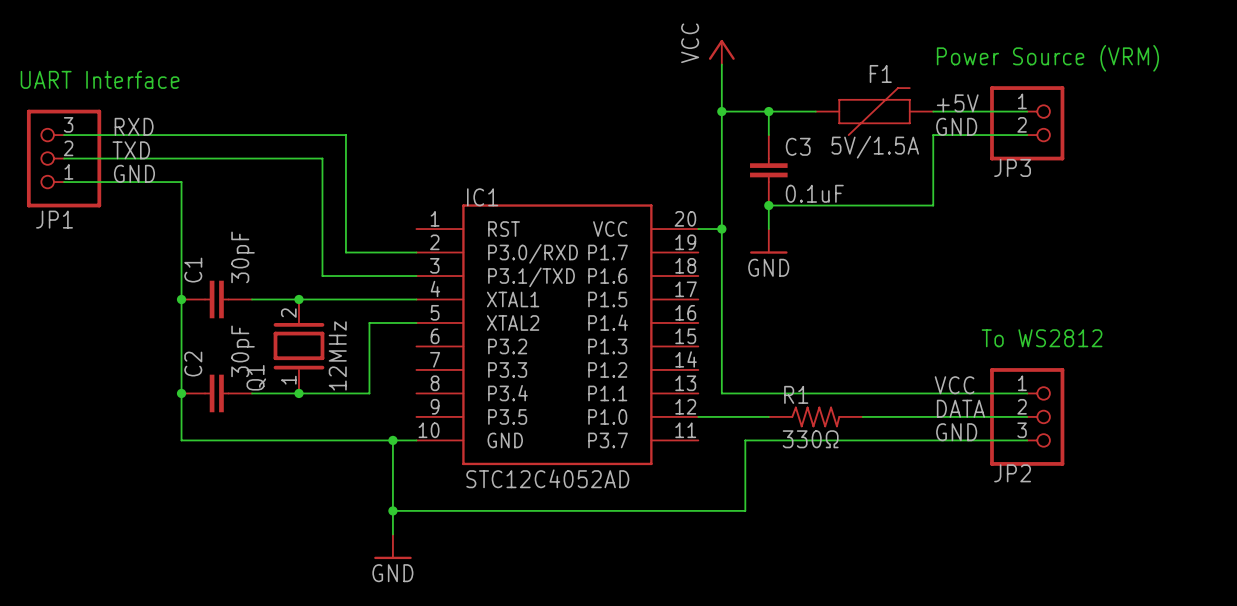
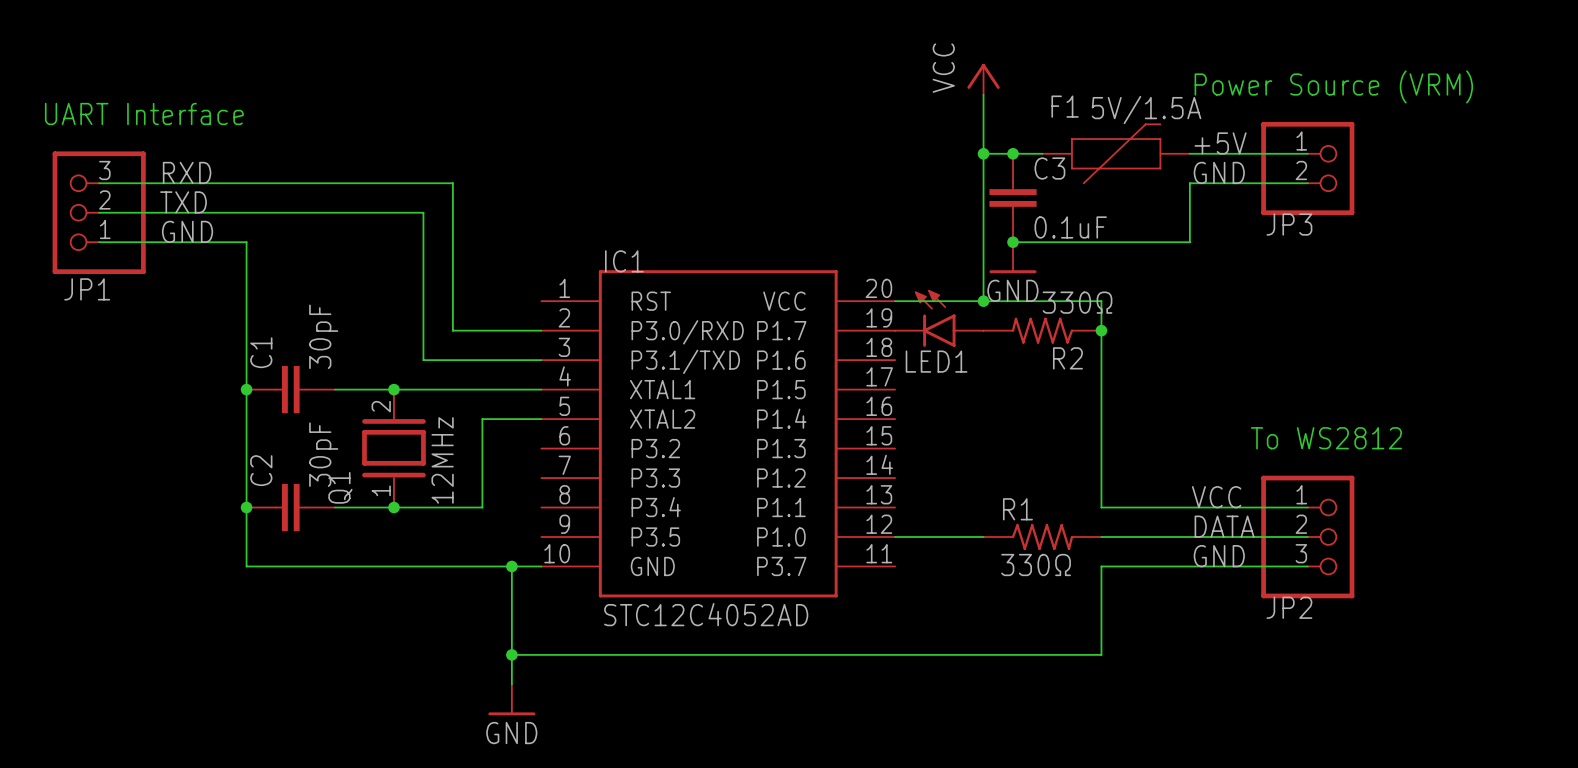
power symbol position: VCC (721, 52) -> VCC (983, 79)
wire: (721, 64) (721, 393) (862, 393) -> (924, 301) (1101, 301) (1101, 507)
F1 name position: F1 (880, 73) -> F1 (1065, 106)
wire: (721, 111) (768, 111) -> (983, 94) (983, 153)
junction: (721, 111) -> none
junction: none -> (1013, 153)
F1 value position: 5V/1.5A (875, 147) -> 5V/1.5A (1146, 110)
C3 position: (768, 170) -> (1013, 197)
junction: none -> (1013, 242)
wire: (933, 182) (933, 205) (768, 205) -> (1189, 242) (1013, 242)
junction: (768, 205) -> none
junction: (721, 229) -> none
junction: none -> (983, 301)
power symbol position: GND (768, 241) -> GND (1013, 257)
LED1: none -> (939, 318)
R2: none -> 330Ω (1042, 330)
junction: none -> (1101, 330)
wire: (862, 440) (745, 440) (745, 510) -> (1101, 566) (1101, 654) (954, 654)

